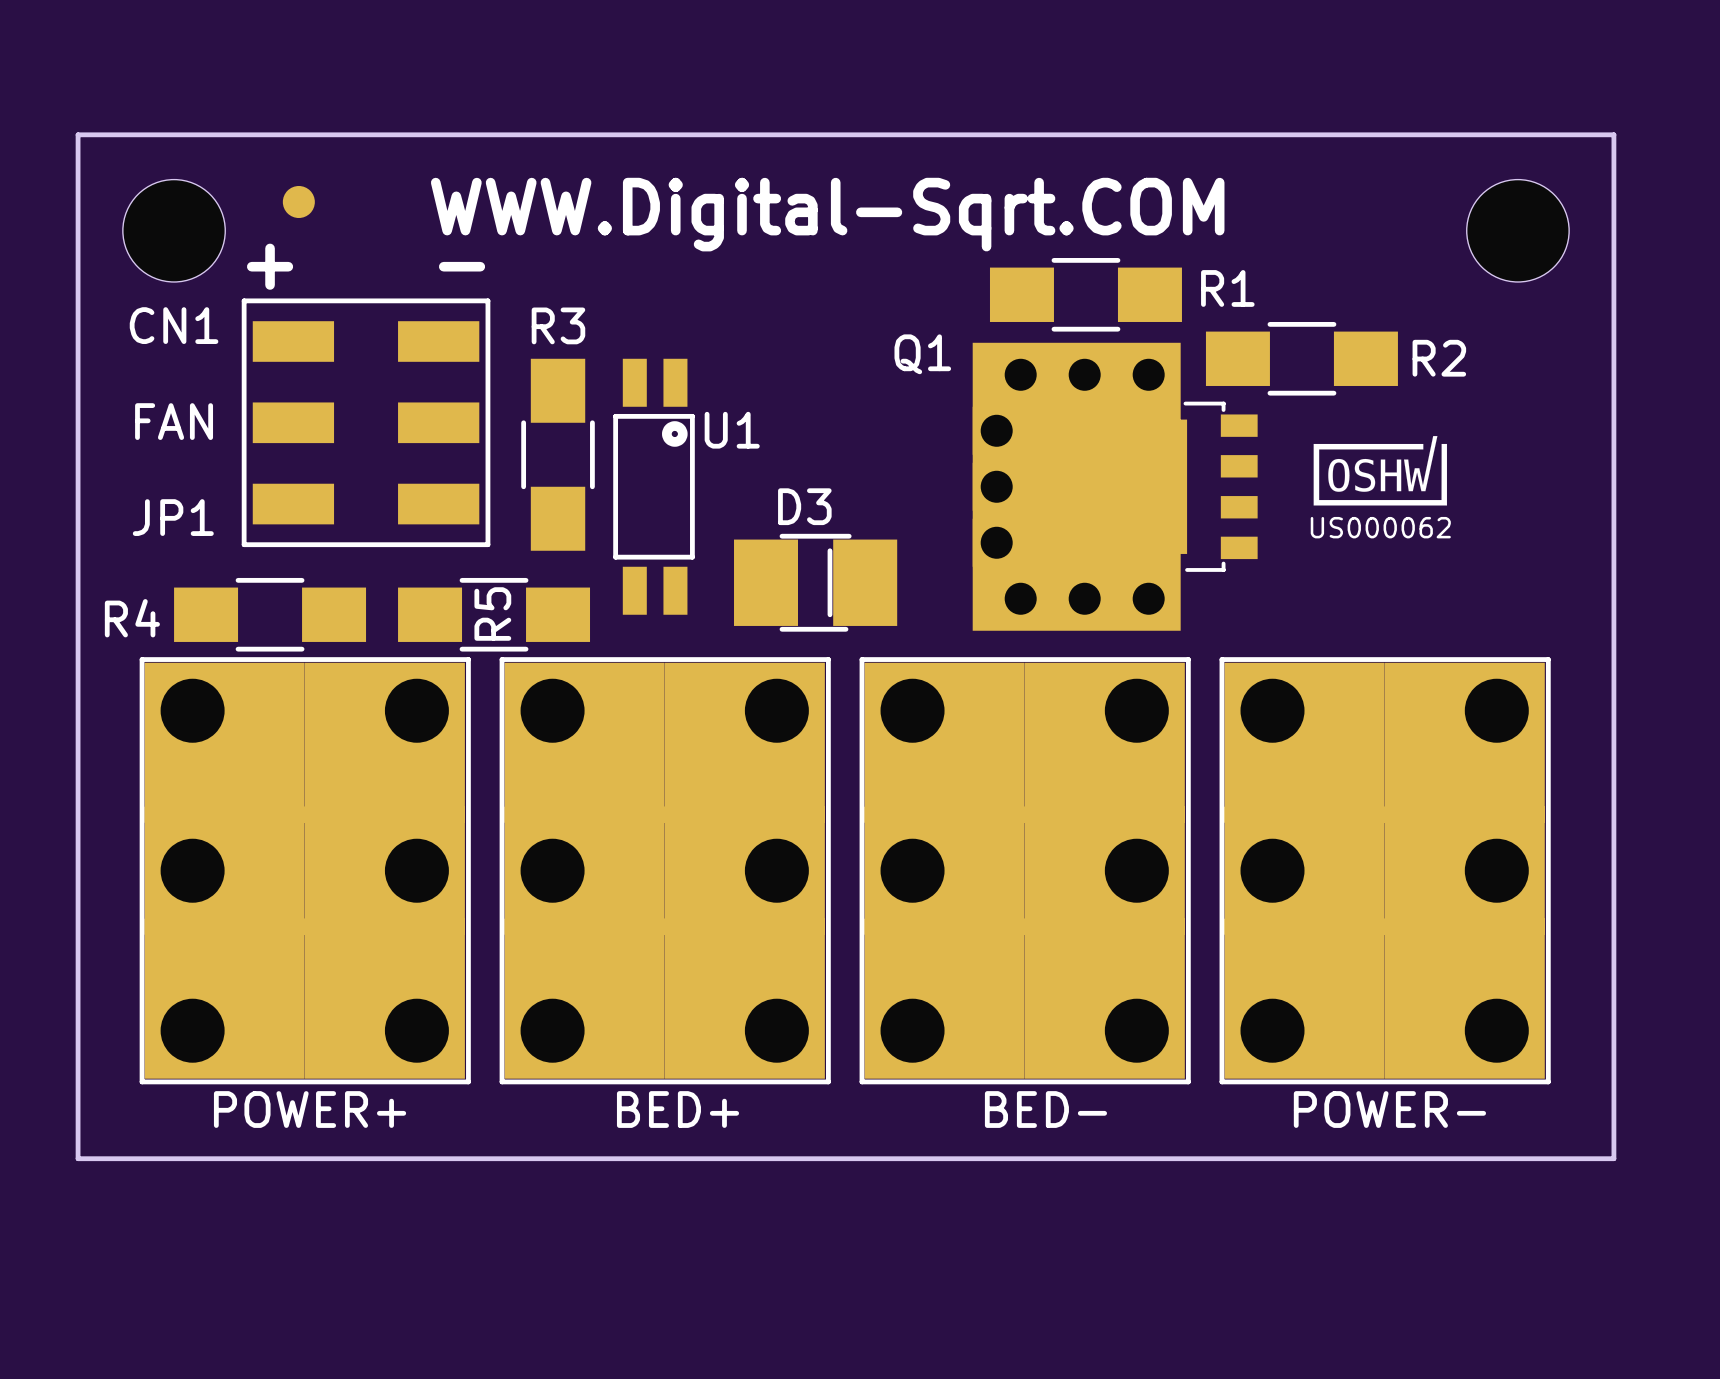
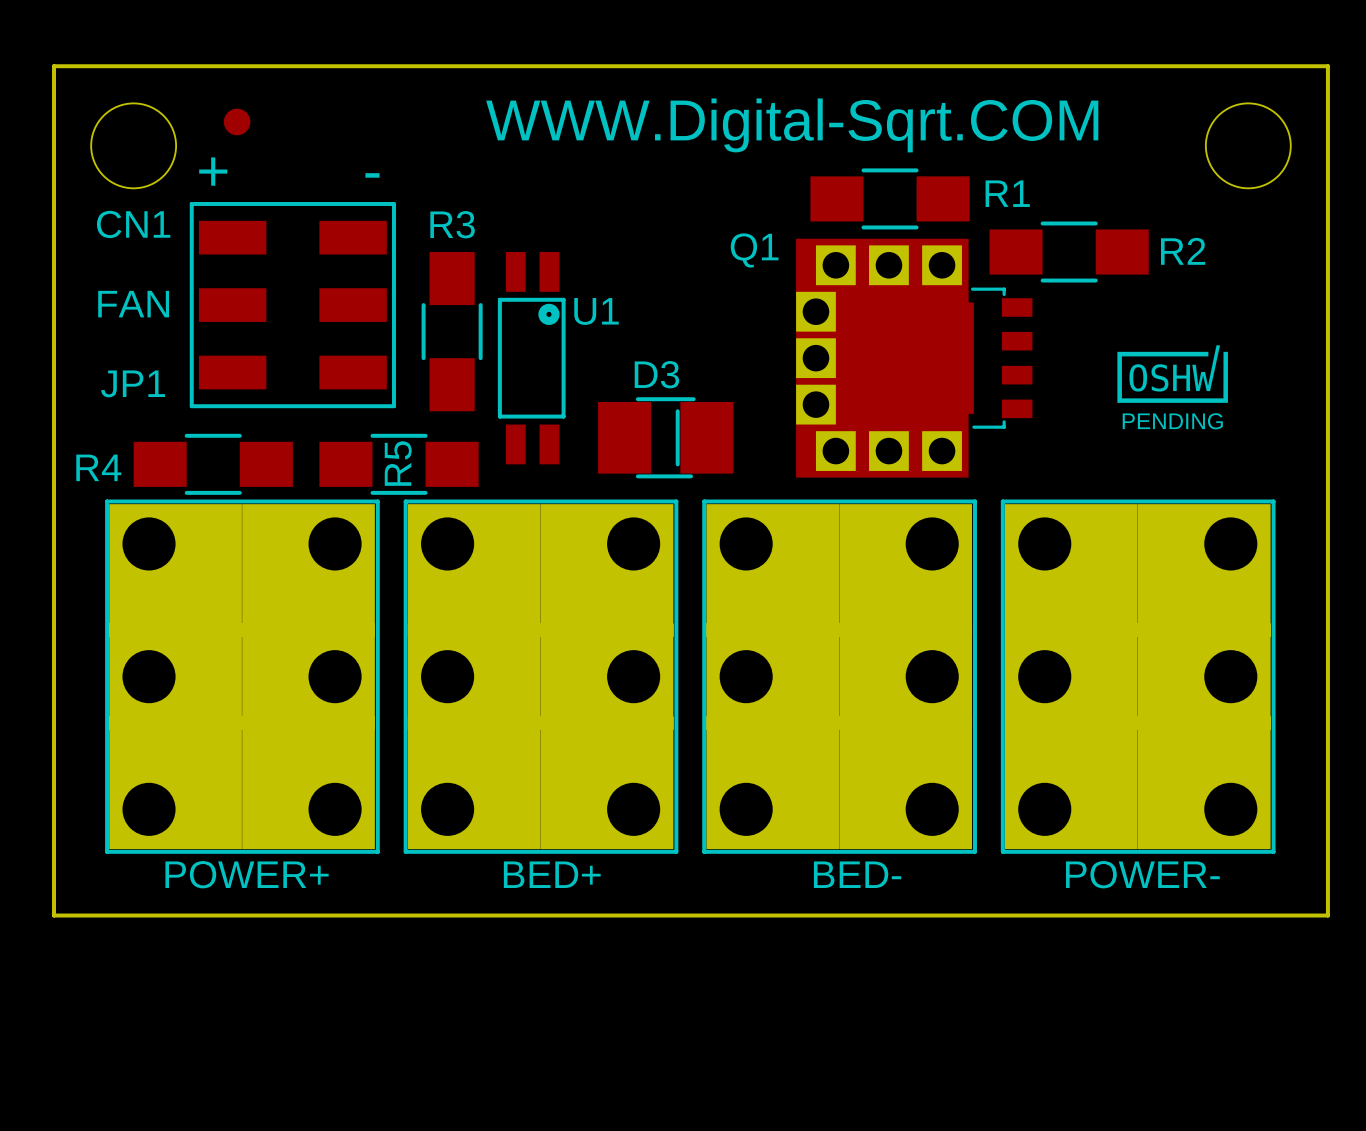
text position: WWW.Digital-Sqrt.COM (827, 214) -> WWW.Digital-Sqrt.COM (792, 125)
drawing: [1313, 436, 1448, 506] -> none
drawing: none -> [1117, 345, 1228, 403]

